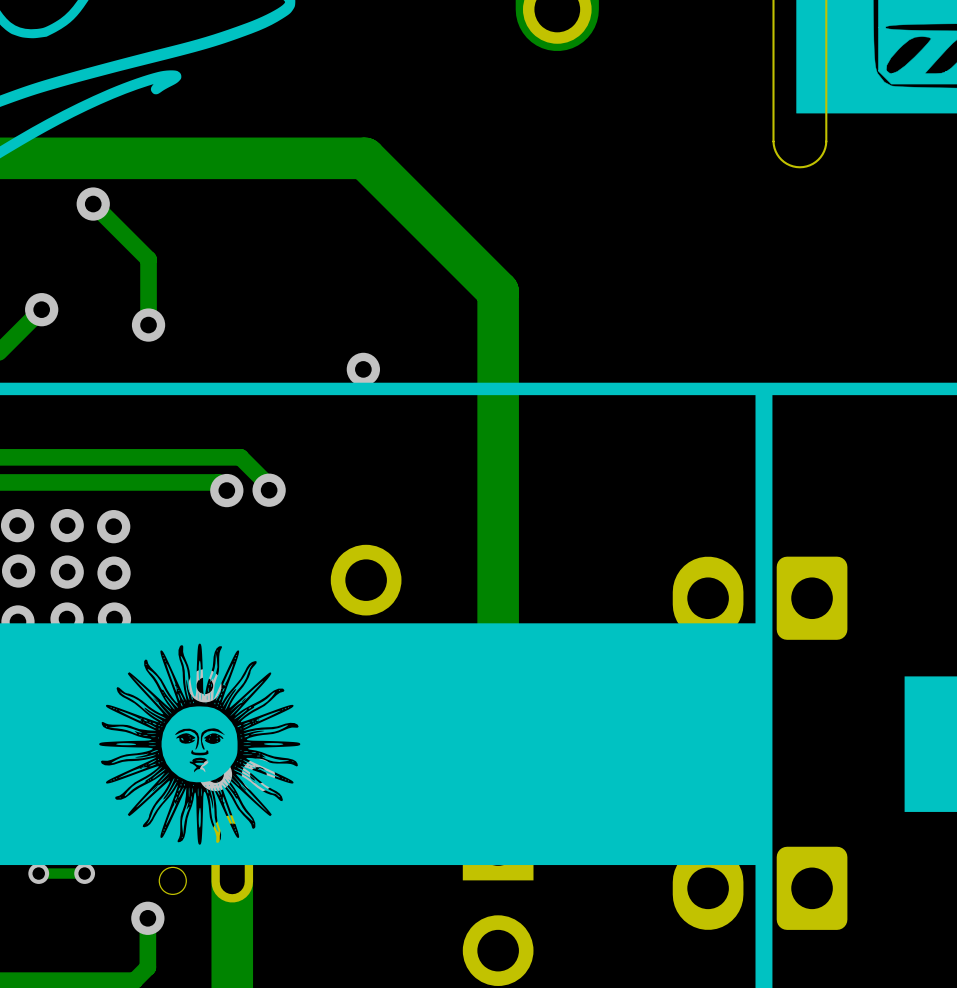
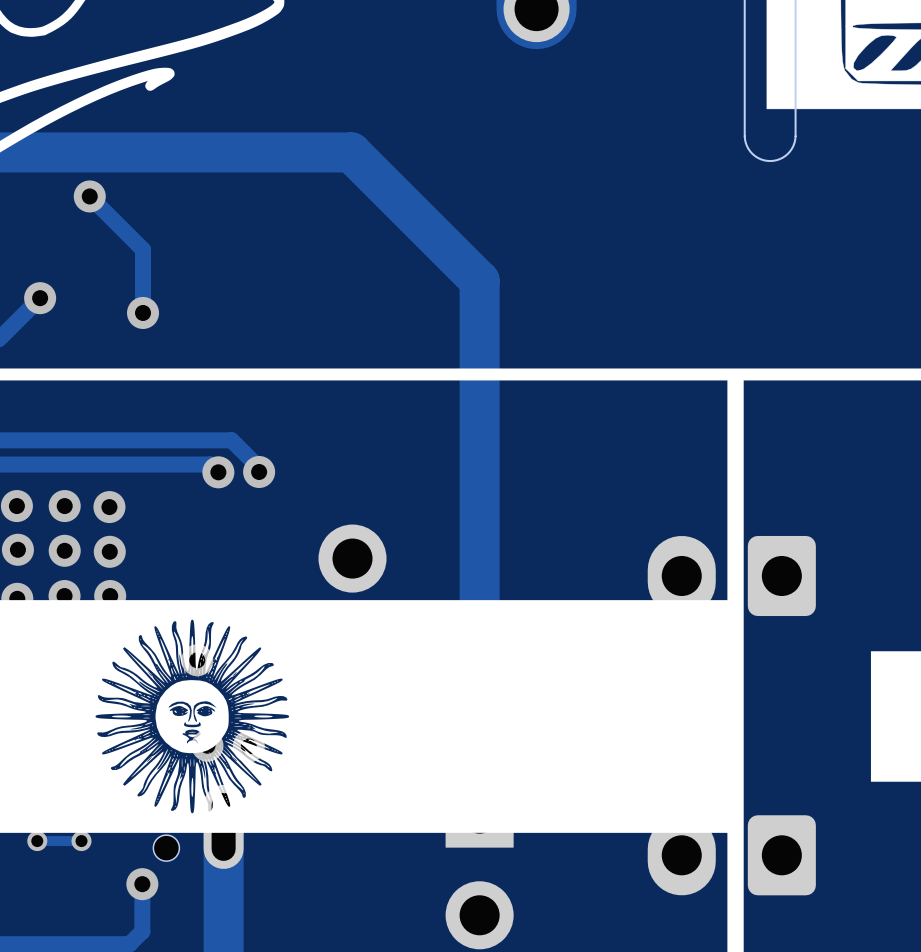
via: (363, 369) -> none

